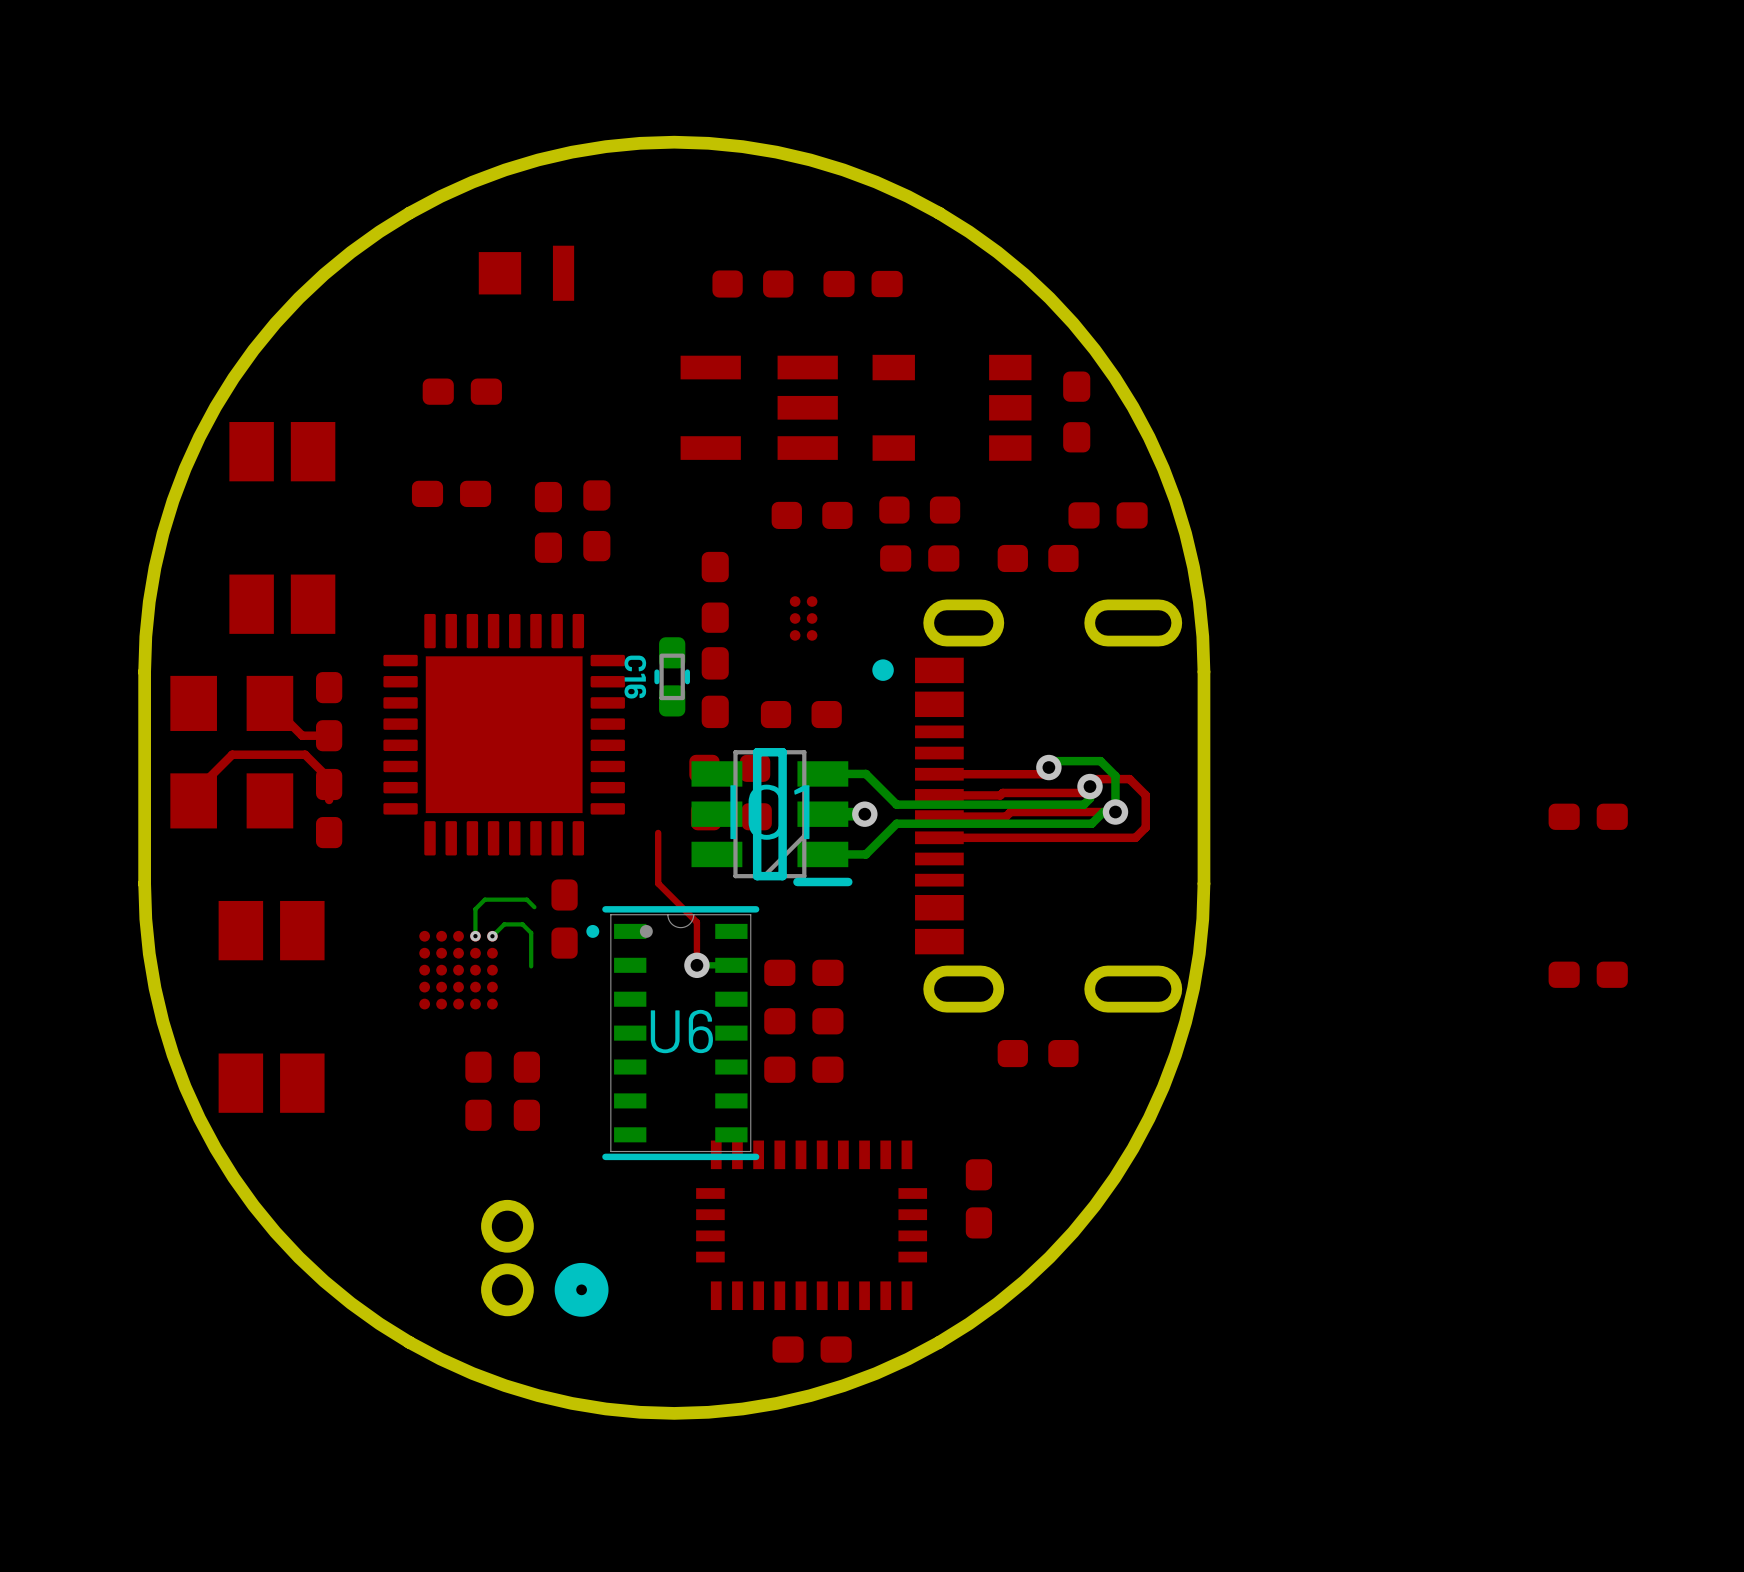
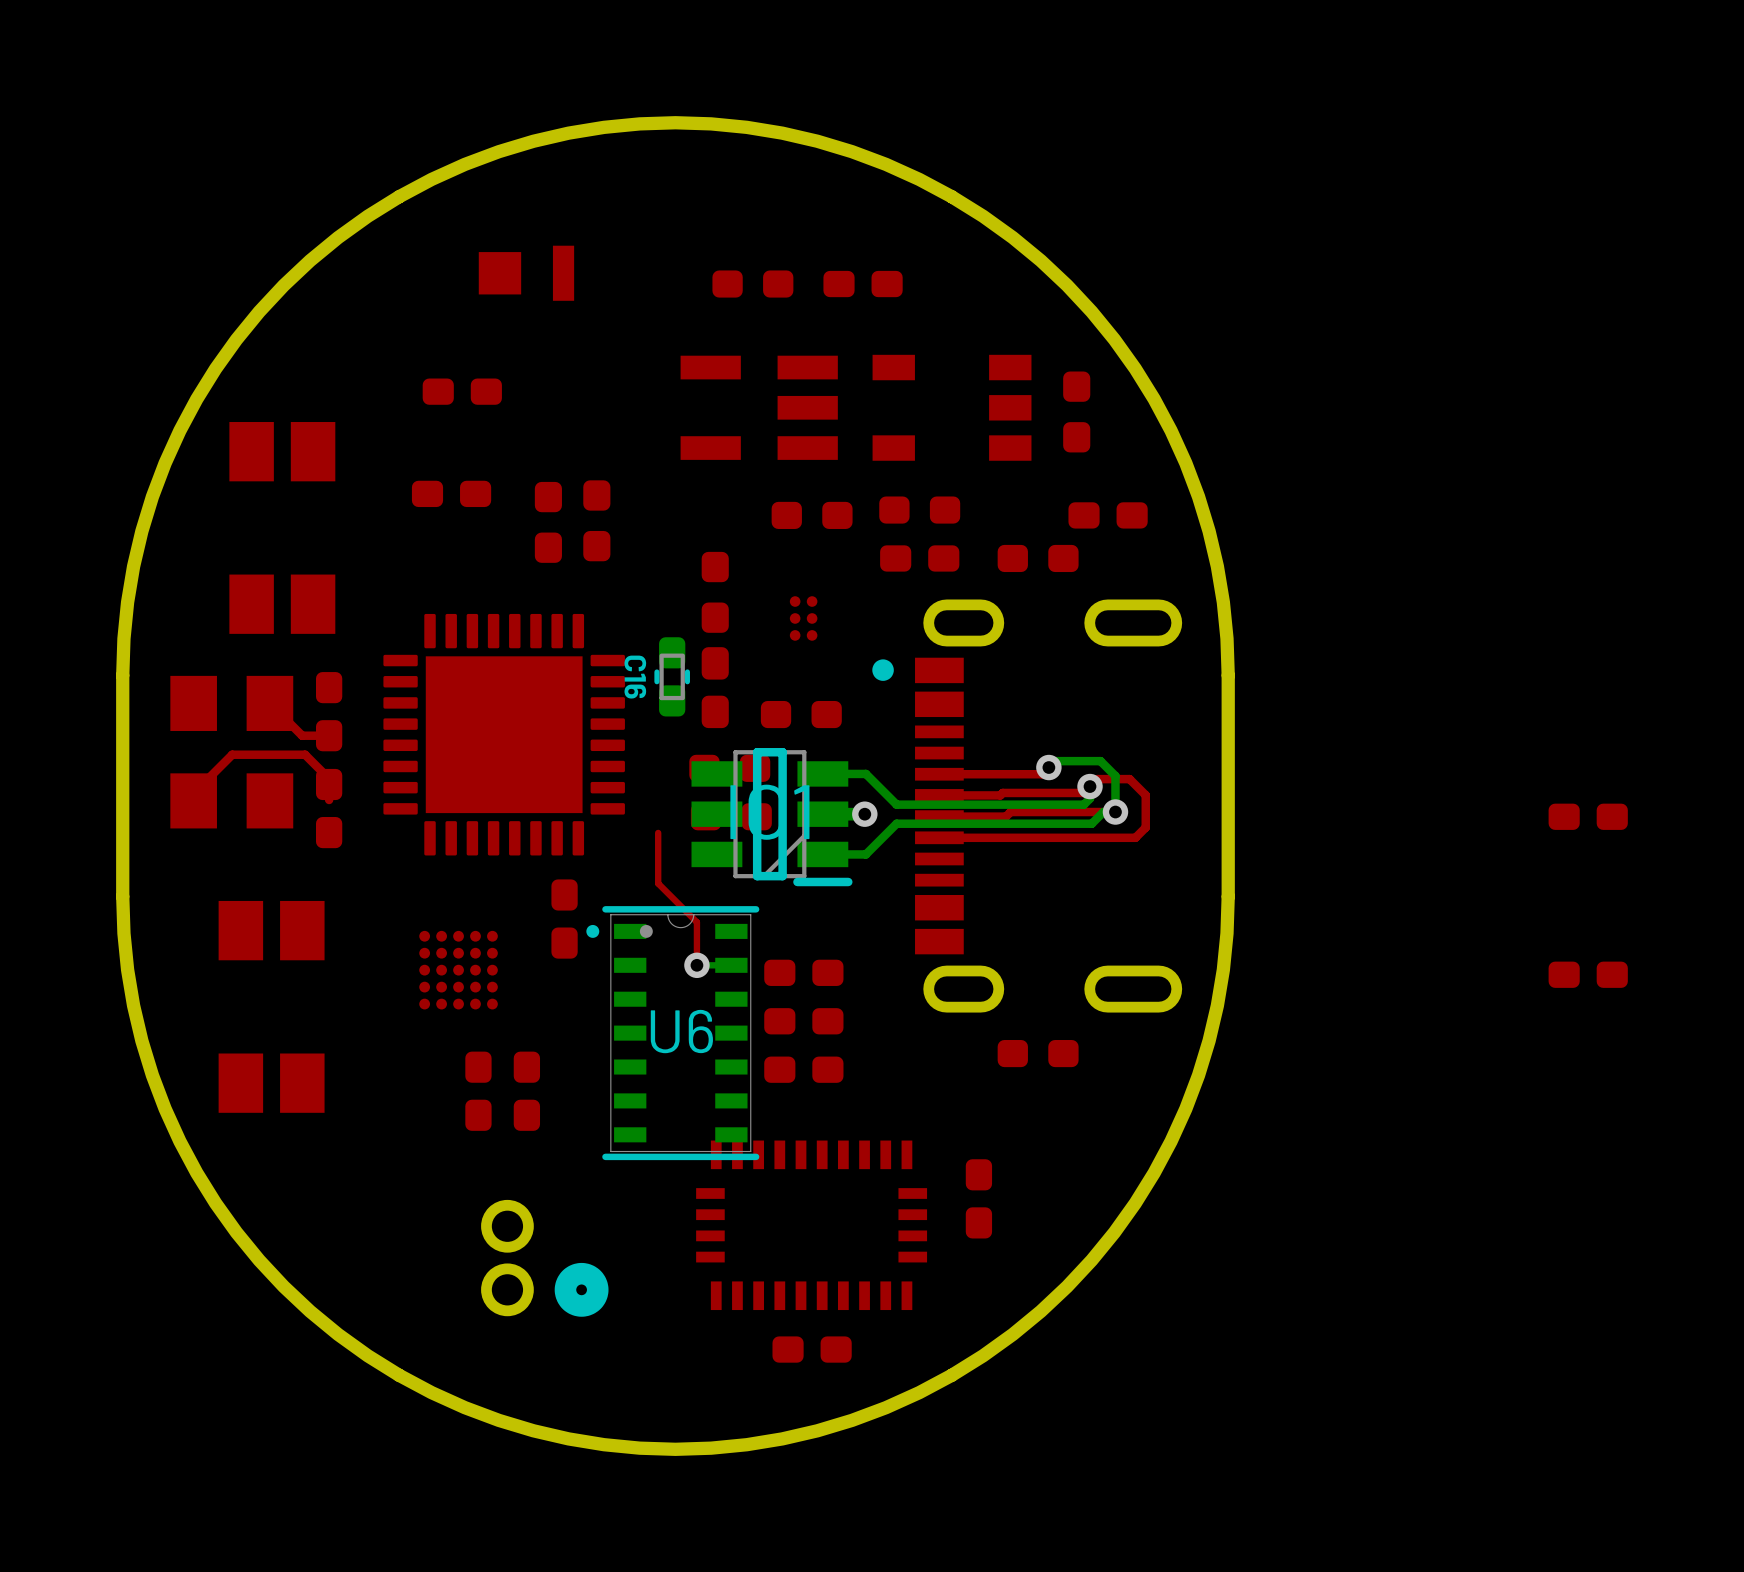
board edge: (939, 213) (969, 231) (1024, 274) (1049, 298) (1094, 349) (1114, 377) (1149, 437) (1175, 500) (1185, 533) (1199, 601) (1202, 636) (1202, 919) (1193, 988) (1185, 1021) (1163, 1087) (1149, 1118) (1114, 1177) (1073, 1232) (1049, 1257) (997, 1303) (969, 1323) (939, 1342) (876, 1373) (843, 1385) (776, 1403) (742, 1408) (674, 1413) (605, 1408) (571, 1403) (505, 1385) (472, 1373) (409, 1342) (379, 1323) (351, 1303) (298, 1257) (275, 1232) (233, 1177) (199, 1118) (173, 1054) (155, 988) (145, 919) (144, 671) (145, 636) (155, 567) (162, 533) (185, 468) (215, 407) (253, 349) (298, 298) (324, 274) (379, 231) (409, 213) (440, 196) (505, 169) (538, 159) (605, 146) (674, 142) (742, 146) (810, 159) (843, 169) (907, 196) (939, 213) -> (951, 196) (983, 216) (1040, 260) (1067, 285) (1114, 339) (1135, 368) (1171, 430) (1198, 496) (1209, 531) (1223, 602) (1226, 638) (1226, 933) (1217, 1005) (1209, 1040) (1185, 1108) (1171, 1141) (1135, 1203) (1091, 1260) (1067, 1286) (1012, 1334) (983, 1355) (951, 1375) (886, 1407) (851, 1420) (782, 1438) (746, 1444) (675, 1449) (604, 1444) (568, 1438) (498, 1420) (464, 1407) (399, 1375) (367, 1355) (338, 1334) (283, 1286) (259, 1260) (215, 1203) (179, 1141) (152, 1075) (133, 1005) (123, 933) (122, 675) (123, 638) (133, 566) (141, 531) (165, 463) (196, 399) (236, 339) (283, 285) (310, 260) (367, 216) (399, 196) (431, 179) (498, 151) (533, 141) (604, 127) (675, 122) (746, 127) (817, 141) (851, 151) (919, 179) (951, 196)
bottom track: (534, 907) (526, 899) (484, 899) (475, 909) (475, 936) -> none
via: (475, 936) -> none
bottom track: (492, 936) (504, 924) (522, 924) (531, 933) (531, 966) -> none
via: (492, 936) -> none

